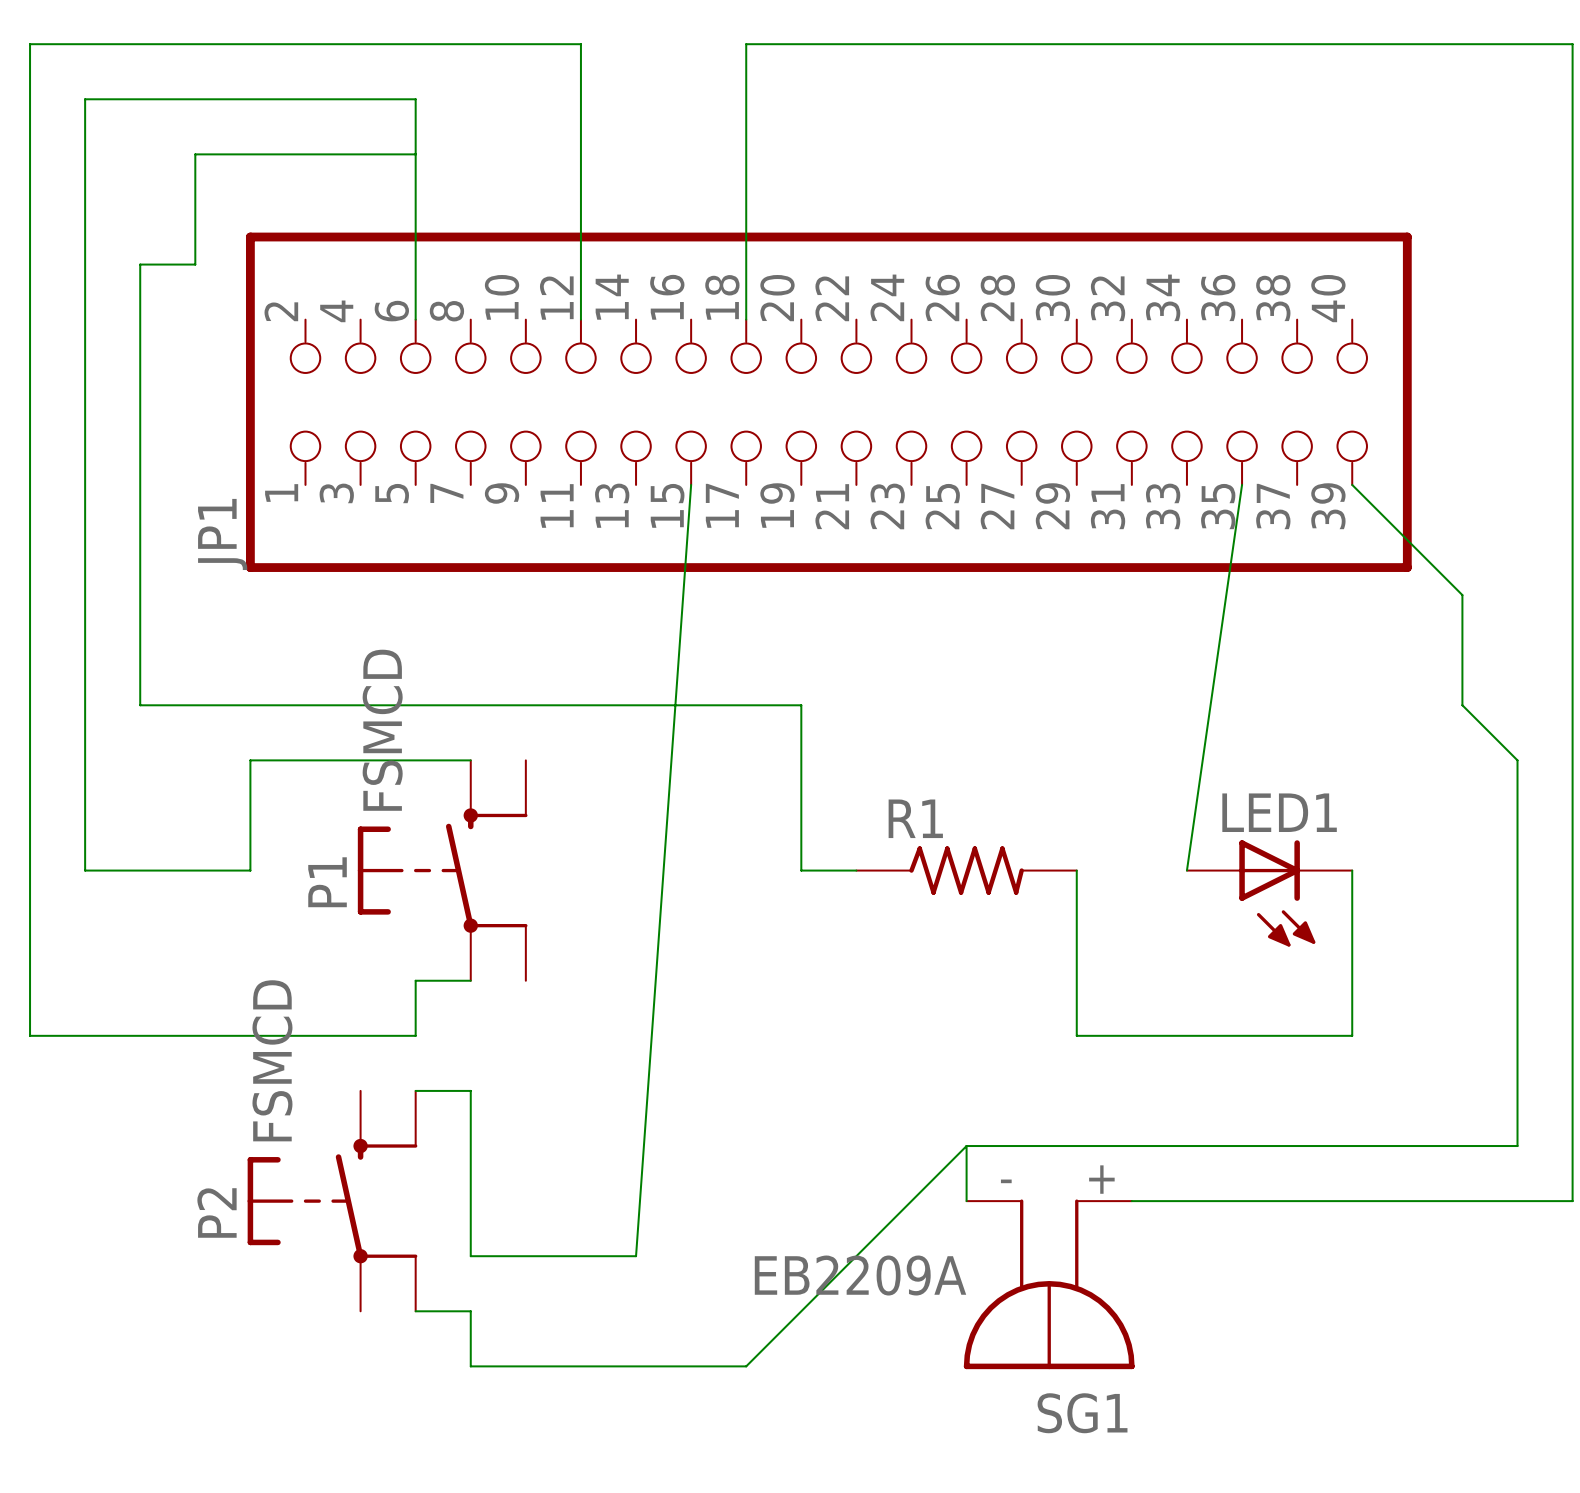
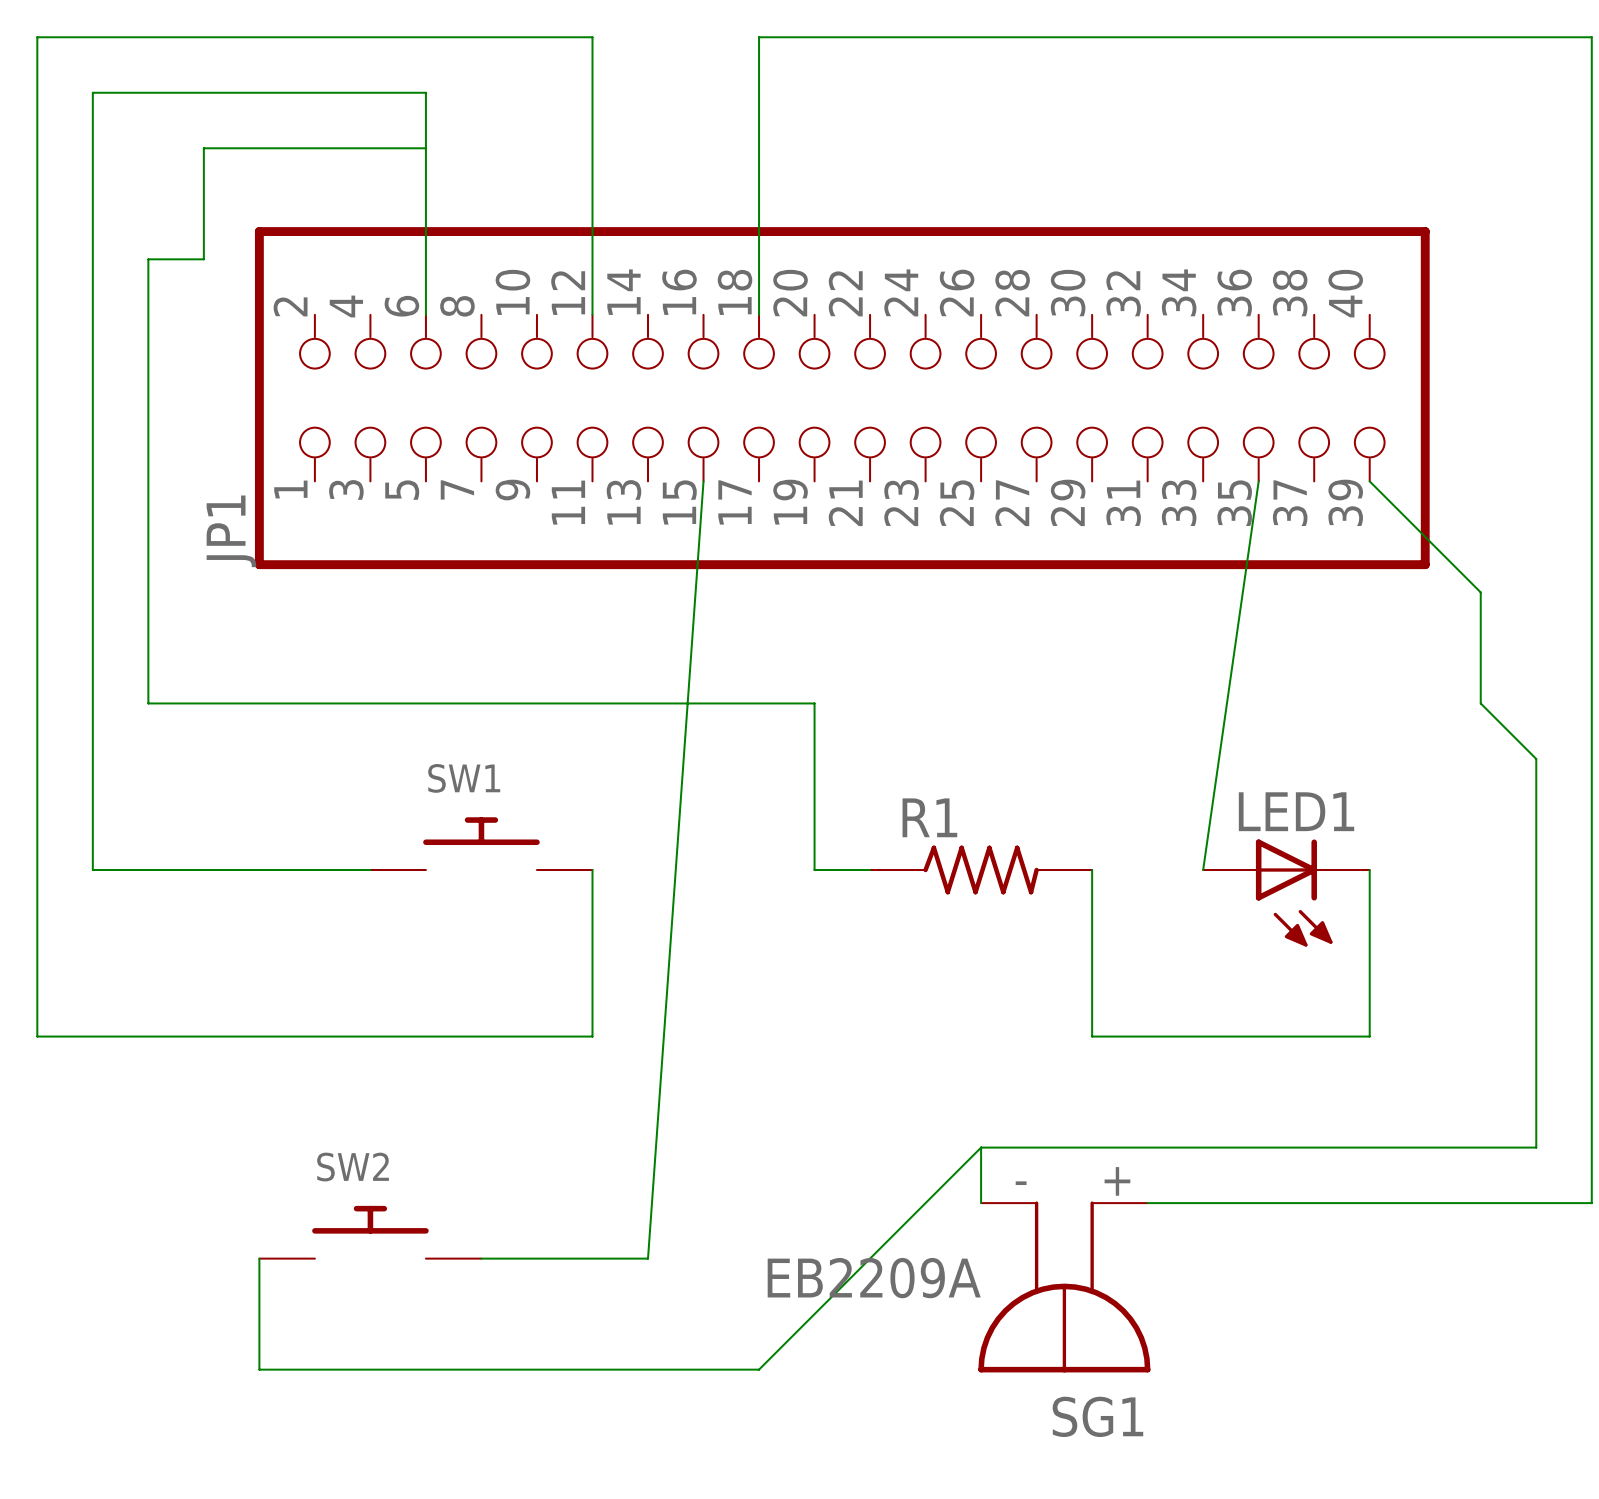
wire: (470, 760) (250, 760) (250, 870) -> (370, 870) (259, 870)
SW1: none -> (481, 843)
P1: FSMCD (442, 870) -> none
wire: (470, 980) (415, 980) (415, 1035) -> (592, 870) (592, 1036) (425, 1036)
wire: (415, 1090) (470, 1090) (470, 1256) -> none
P2: FSMCD (332, 1201) -> none
SW2: none -> (370, 1232)
wire: (415, 1311) (470, 1311) (470, 1366) -> (259, 1258) (259, 1369) (481, 1369)

